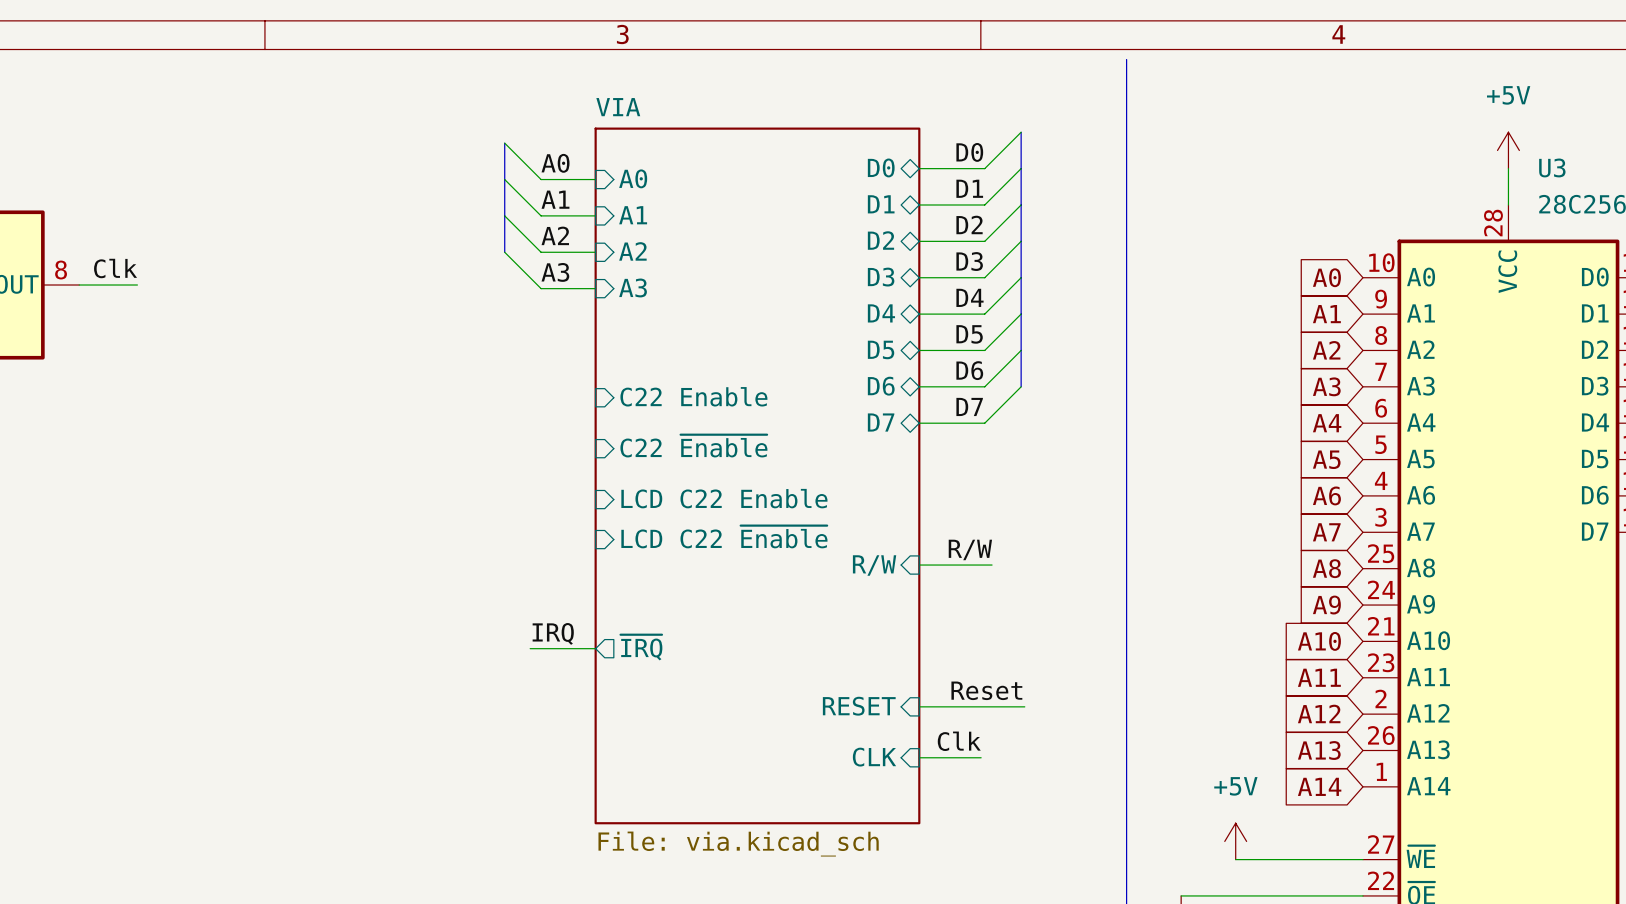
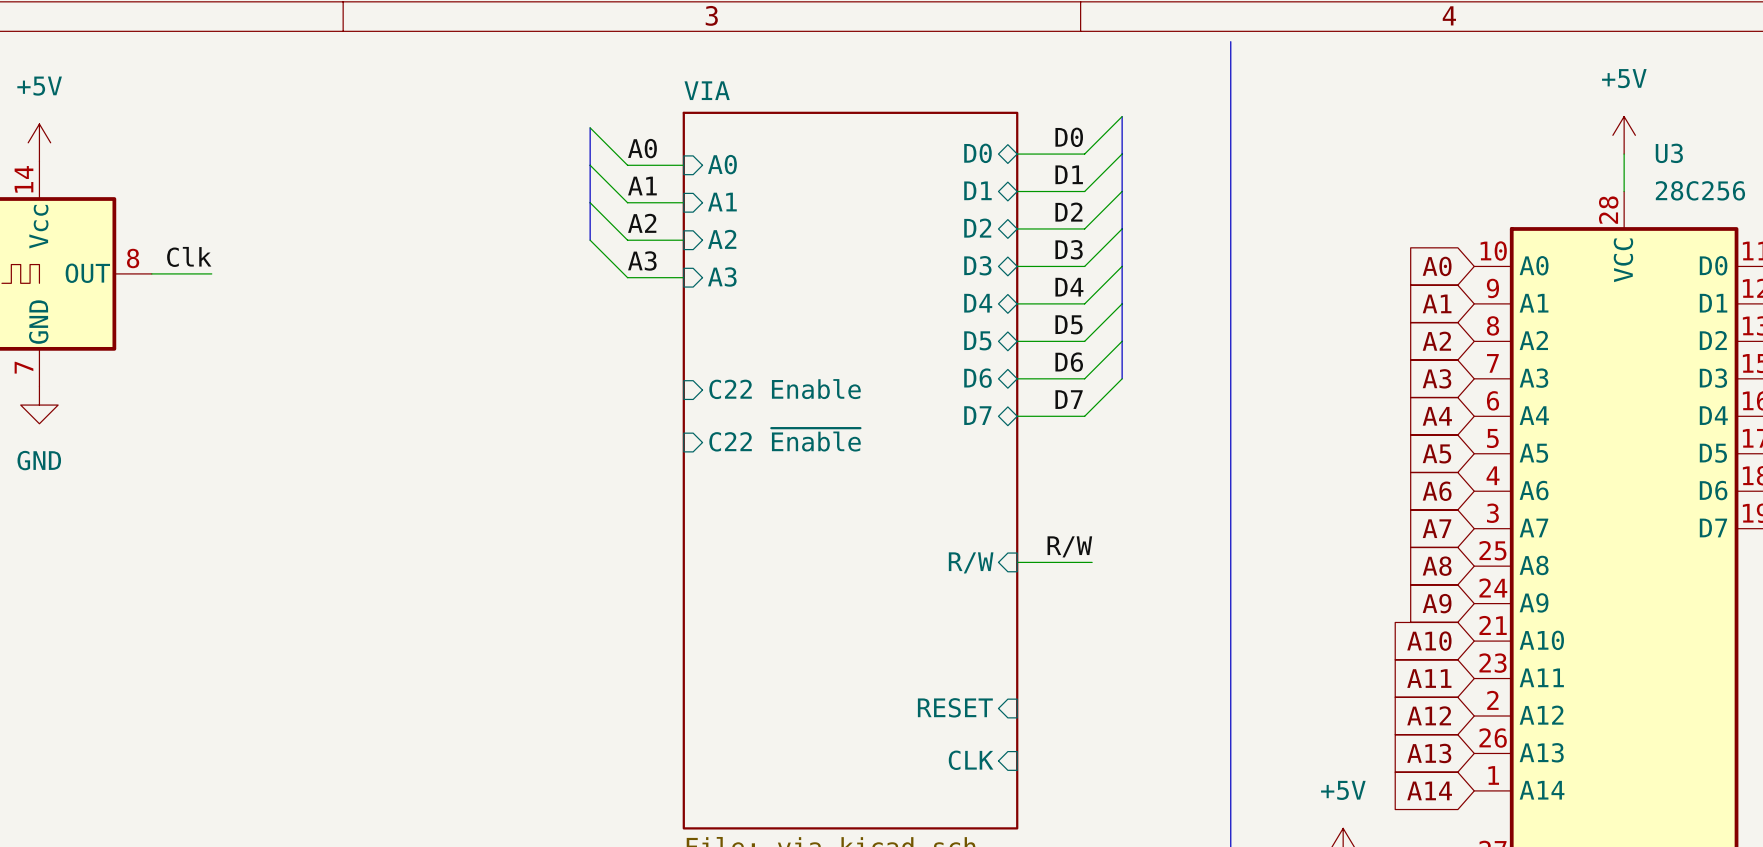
sheet pin: LCD C22 Enable (724, 498) -> none
sheet pin: LCD C22 ~{Enable} (724, 536) -> none
label: IRQ (553, 633) -> none
sheet pin: ~{IRQ} (641, 647) -> none
wire: (530, 648) (595, 648) -> none
label: Reset (986, 690) -> none
wire: (919, 706) (1024, 706) -> none
label: Clk (959, 741) -> none
wire: (919, 757) (981, 757) -> none

